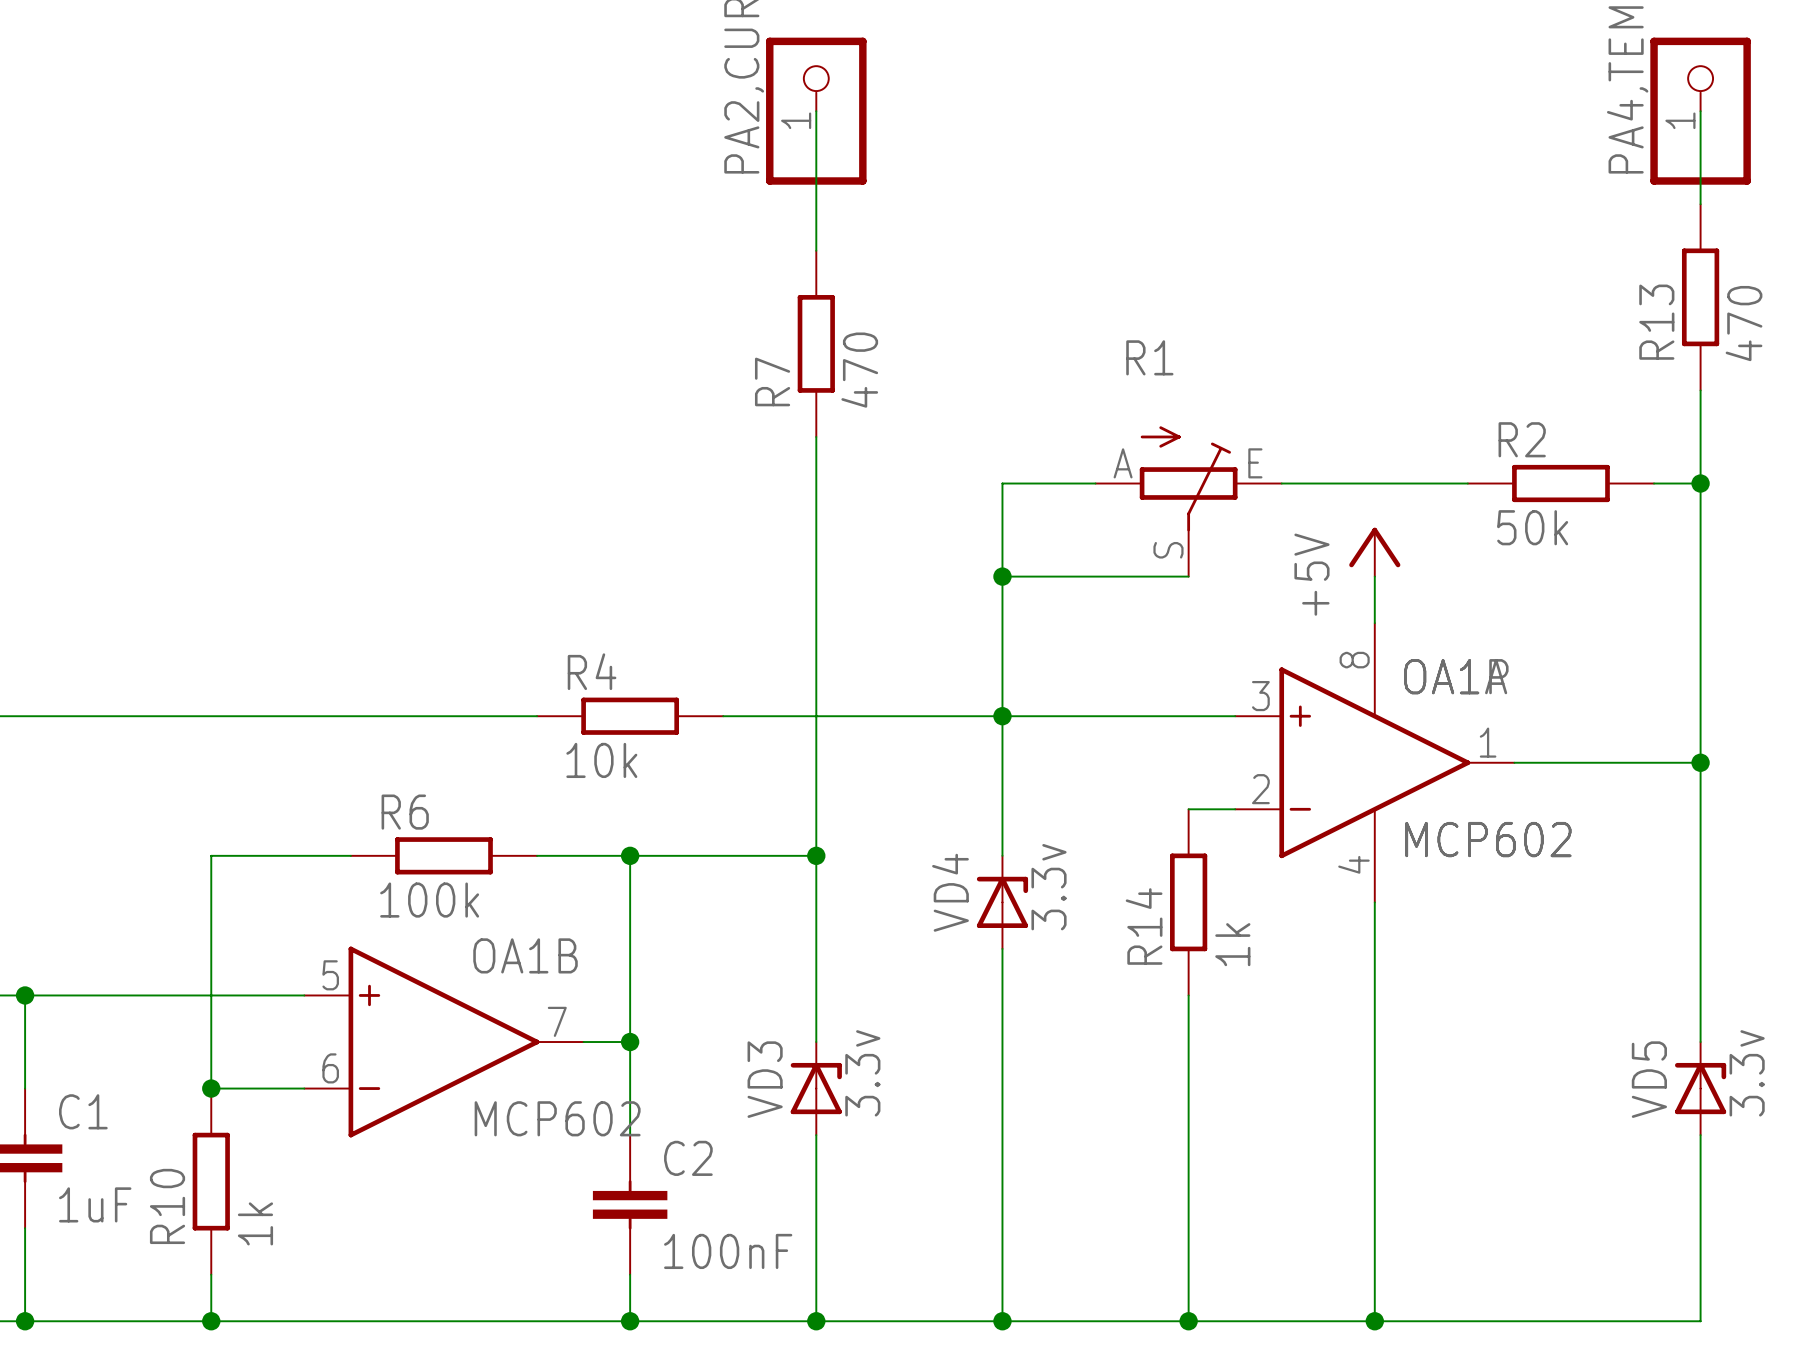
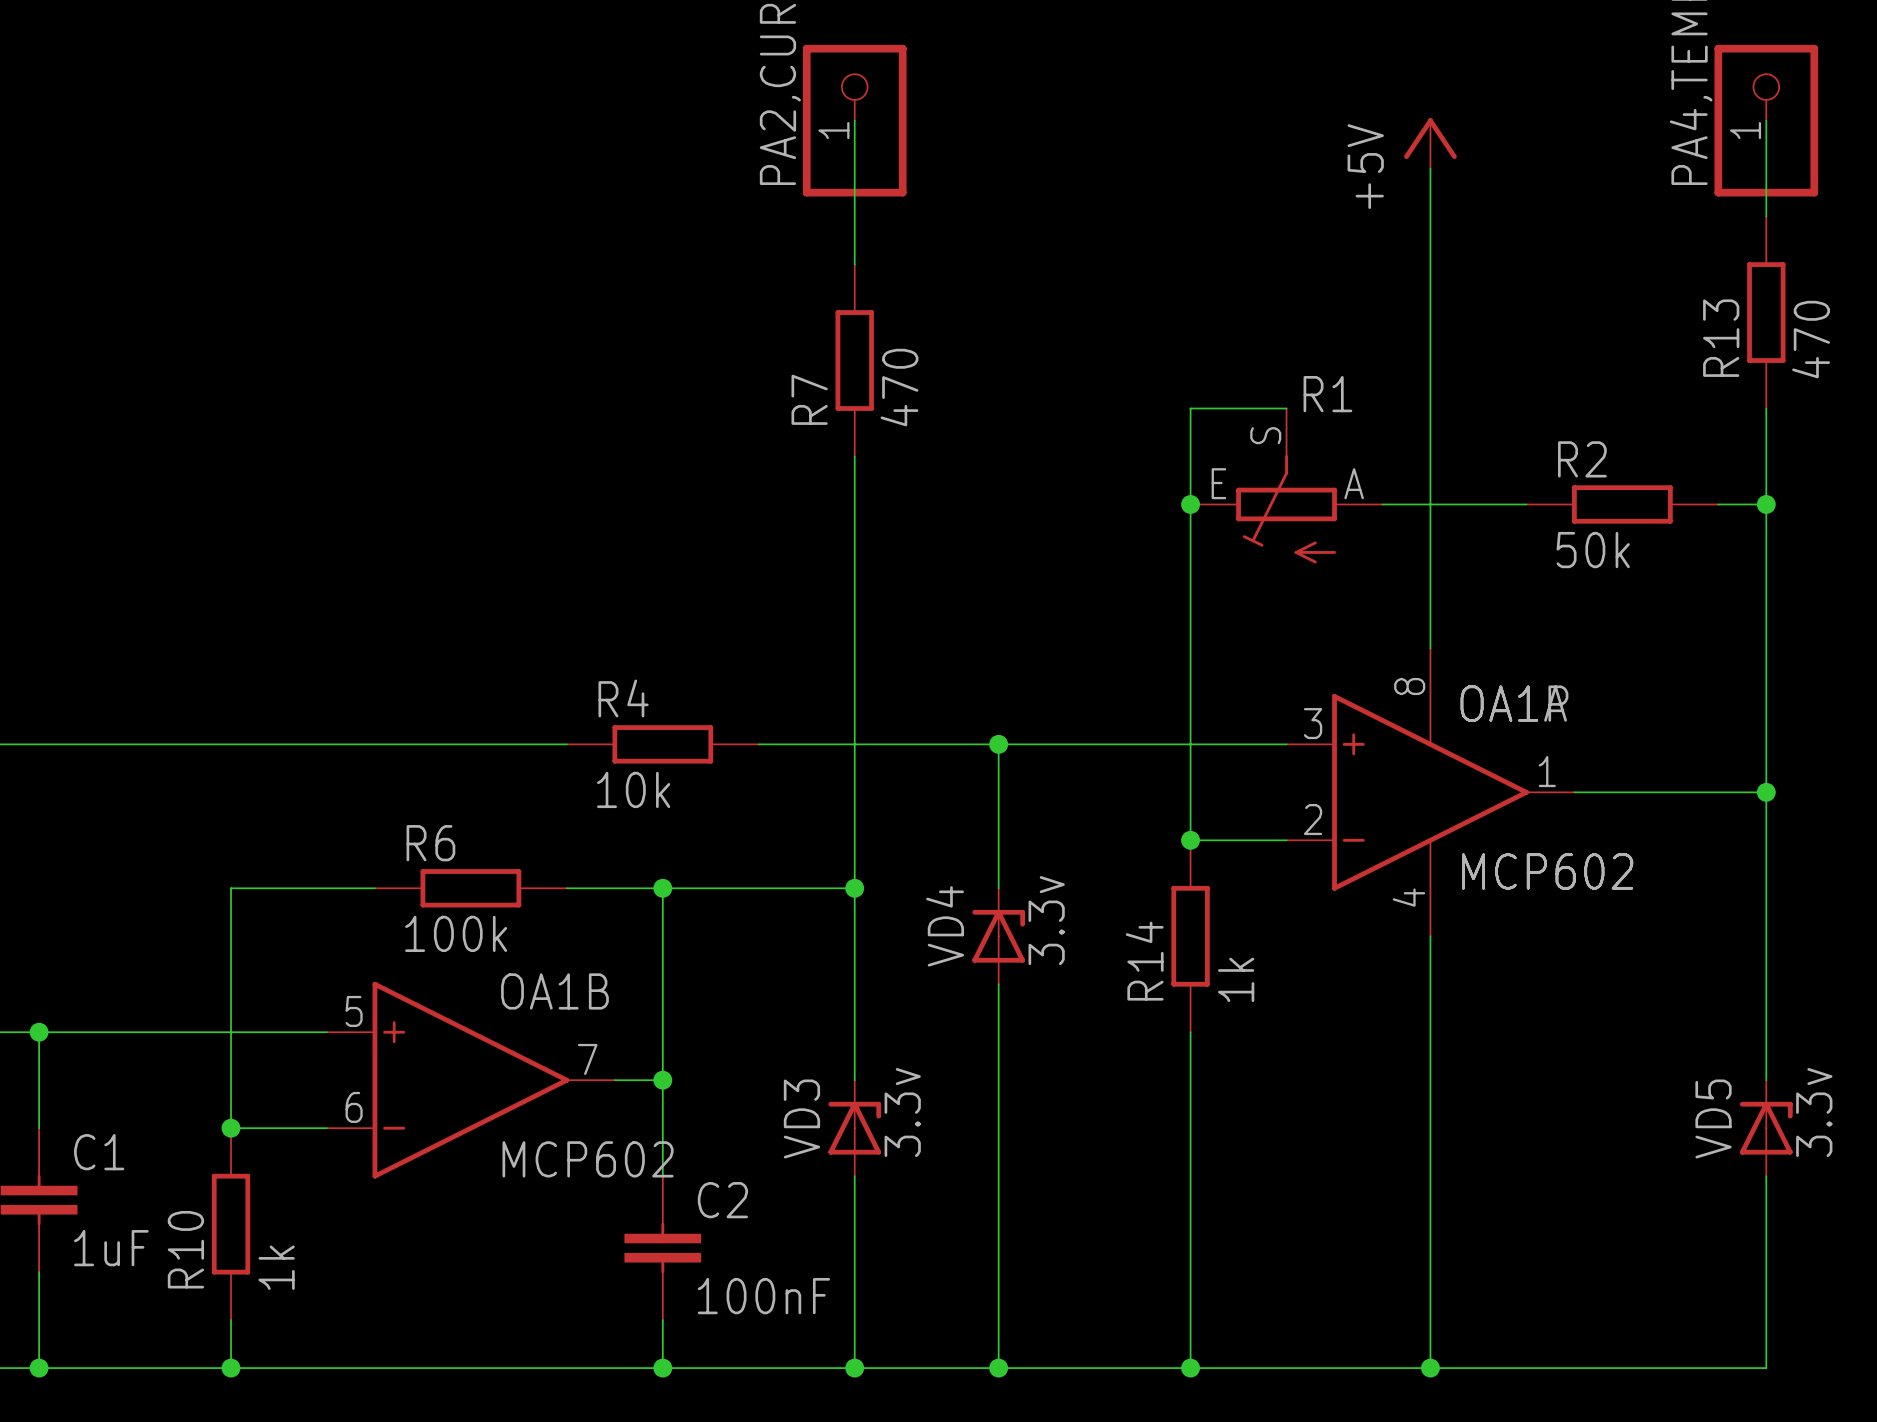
wire: none -> (1430, 168) (1430, 600)
R1 name position: R1 (1149, 357) -> R1 (1327, 394)
wire: none -> (1286, 408) (1190, 408) (1190, 840) (1238, 840)
R1 rotation: 0° (1188, 478) -> 180° (1286, 509)
wire: (1095, 483) (1002, 483) (1002, 855) -> none
junction: none -> (1190, 504)
power symbol position: +5V (1374, 552) -> +5V (1430, 143)
wire: (1002, 576) (1188, 576) -> none
junction: (1002, 576) -> none
wire: none -> (998, 744) (998, 888)
junction position: (1002, 716) -> (998, 744)
junction: none -> (1190, 840)
VD4 position: (1002, 902) -> (998, 936)
R14 position: (1188, 902) -> (1190, 936)
wire: (1002, 948) (1002, 1321) -> (998, 984) (998, 1368)
wire: (1188, 995) (1188, 1321) -> (1190, 1032) (1190, 1368)
junction position: (1002, 1321) -> (998, 1368)
junction position: (1188, 1321) -> (1190, 1368)

